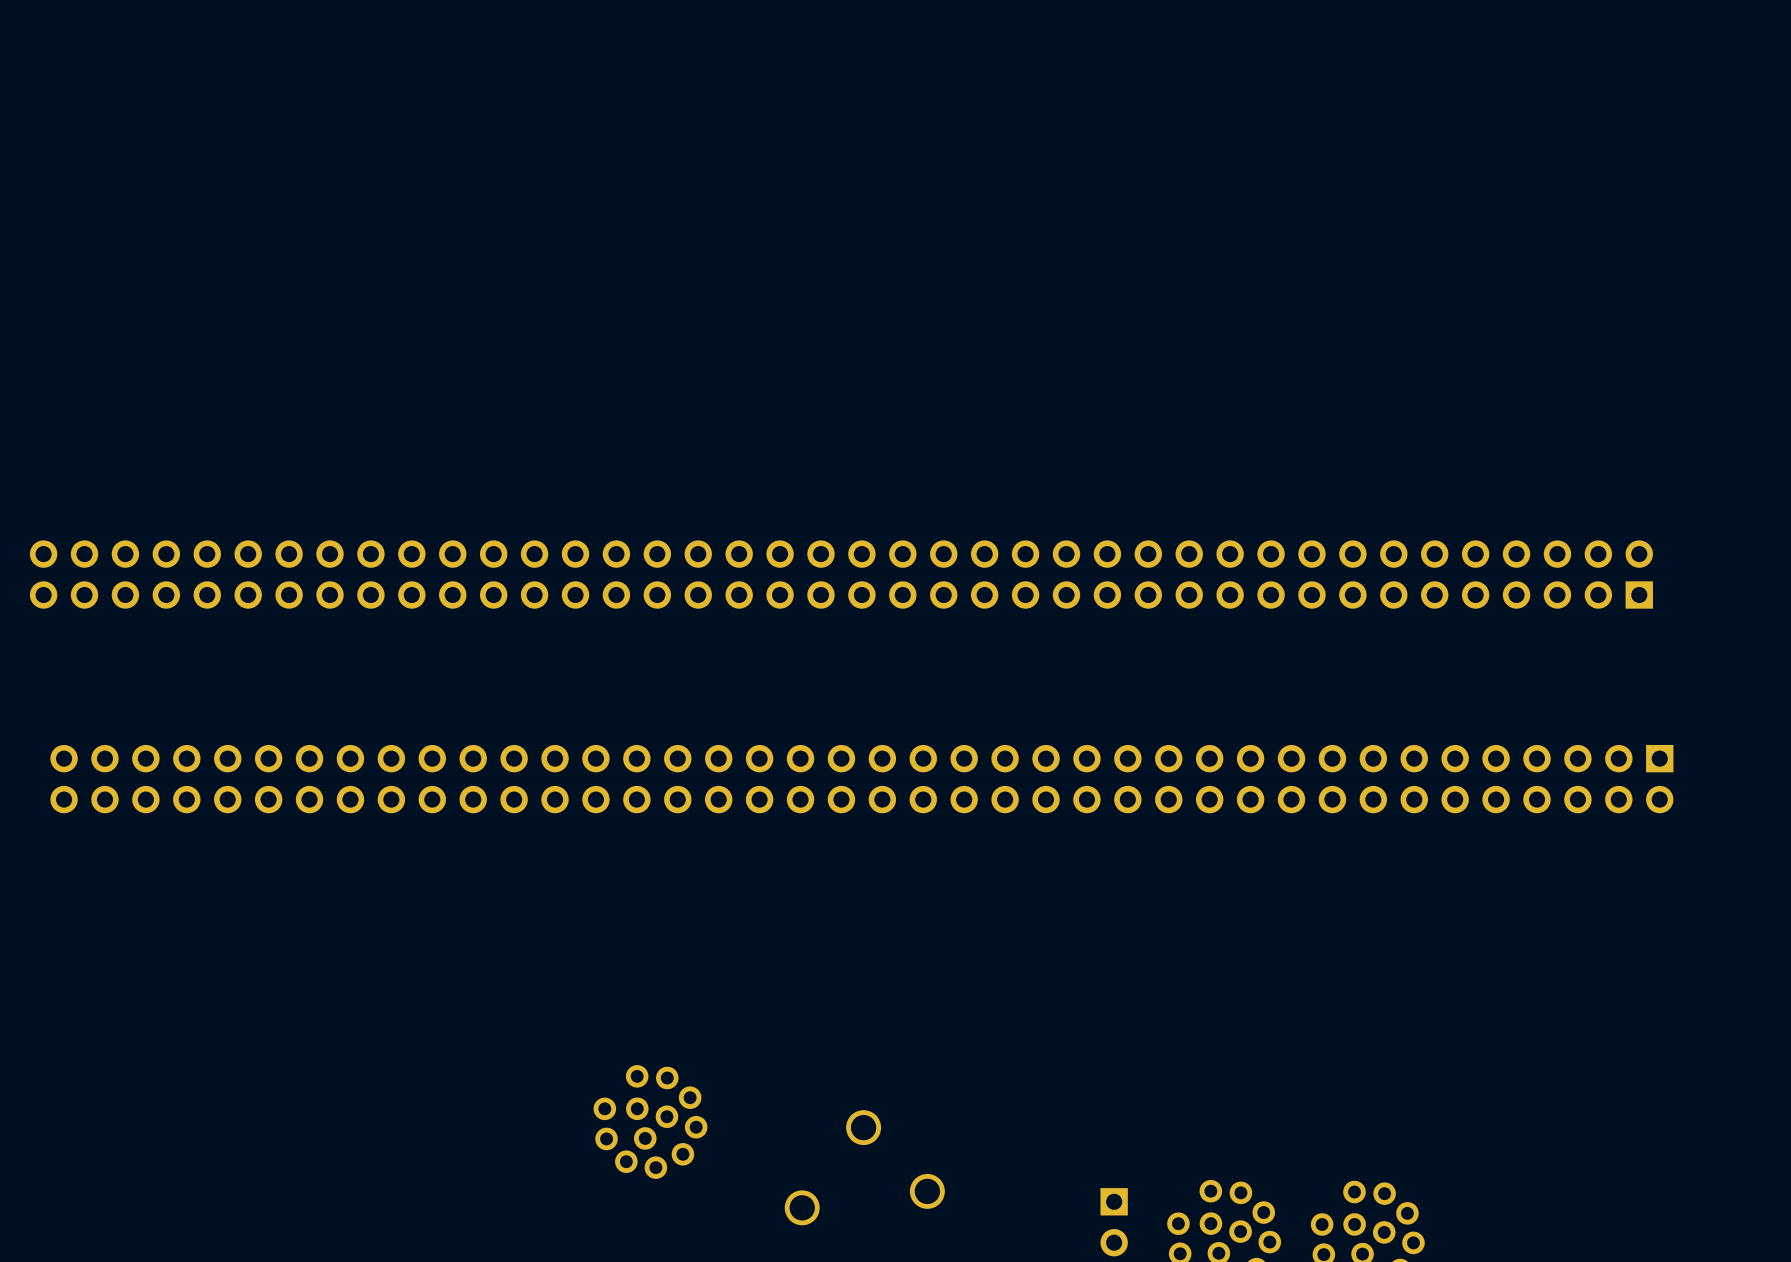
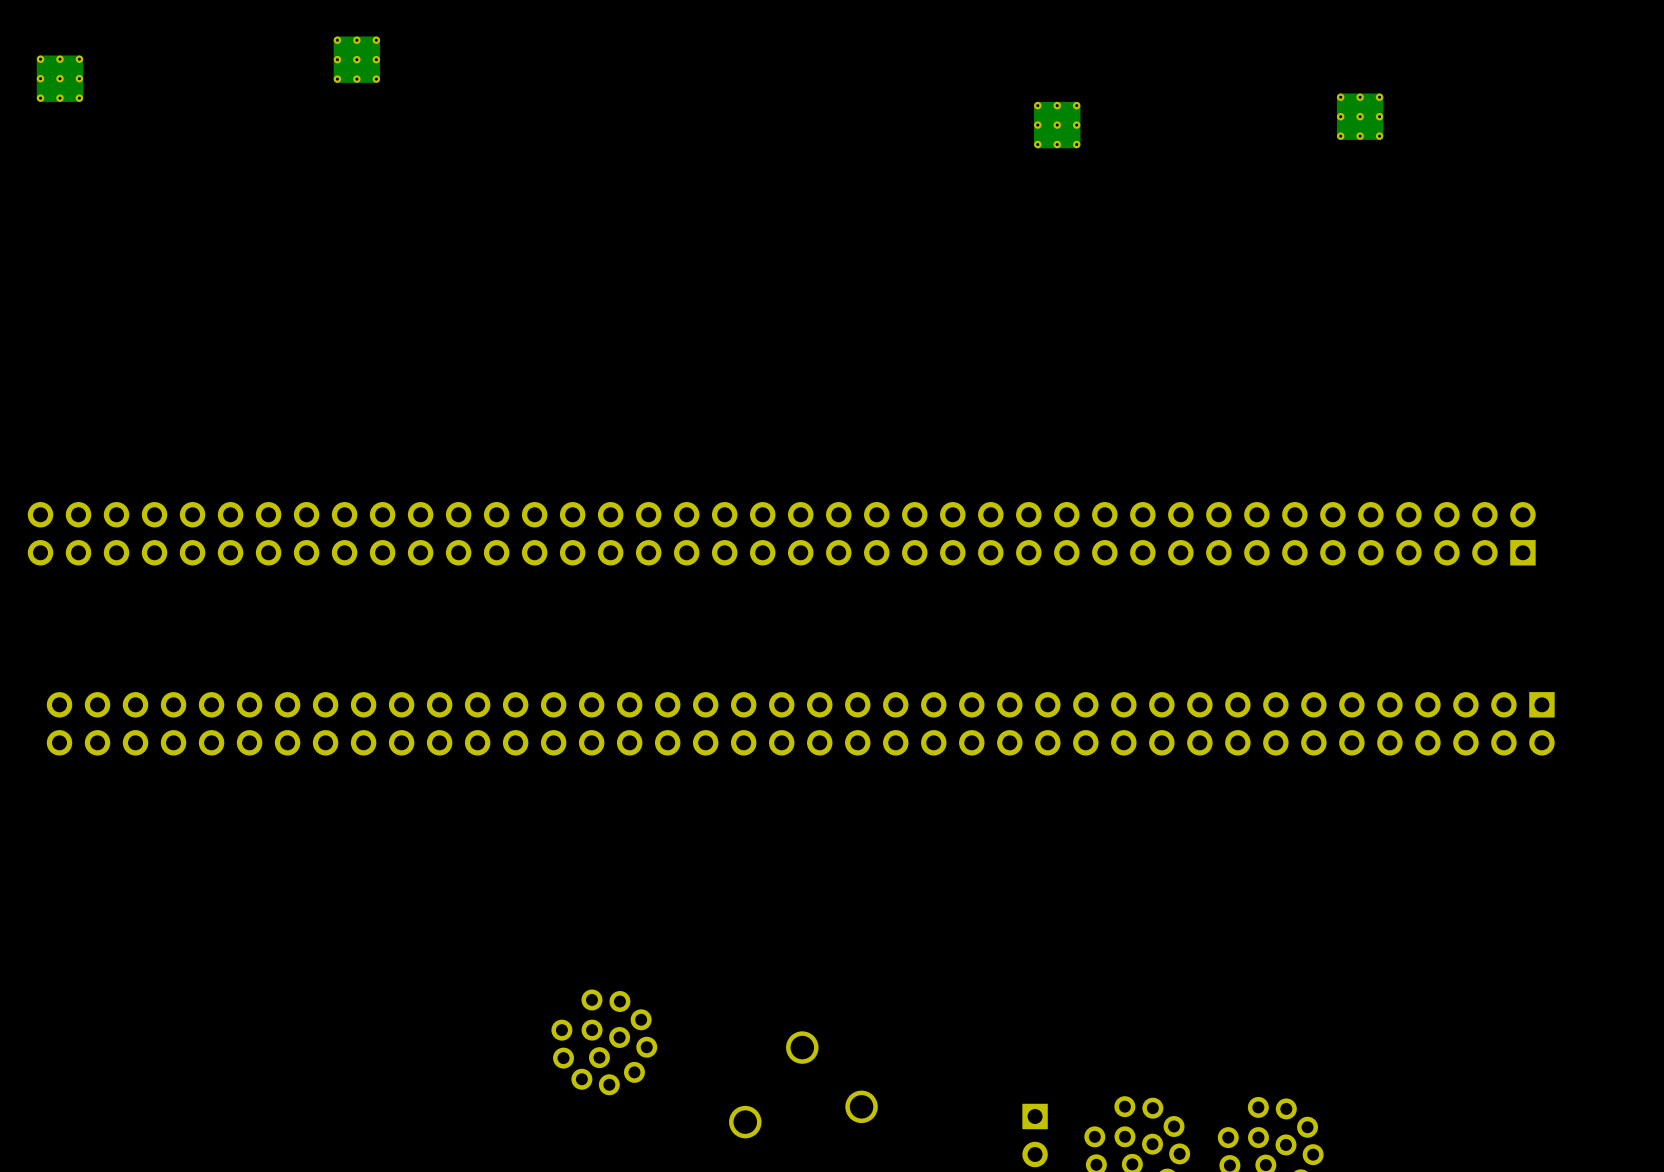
part: none -> (356, 59)
part: none -> (59, 78)
part: none -> (1360, 116)
part: none -> (1057, 125)

